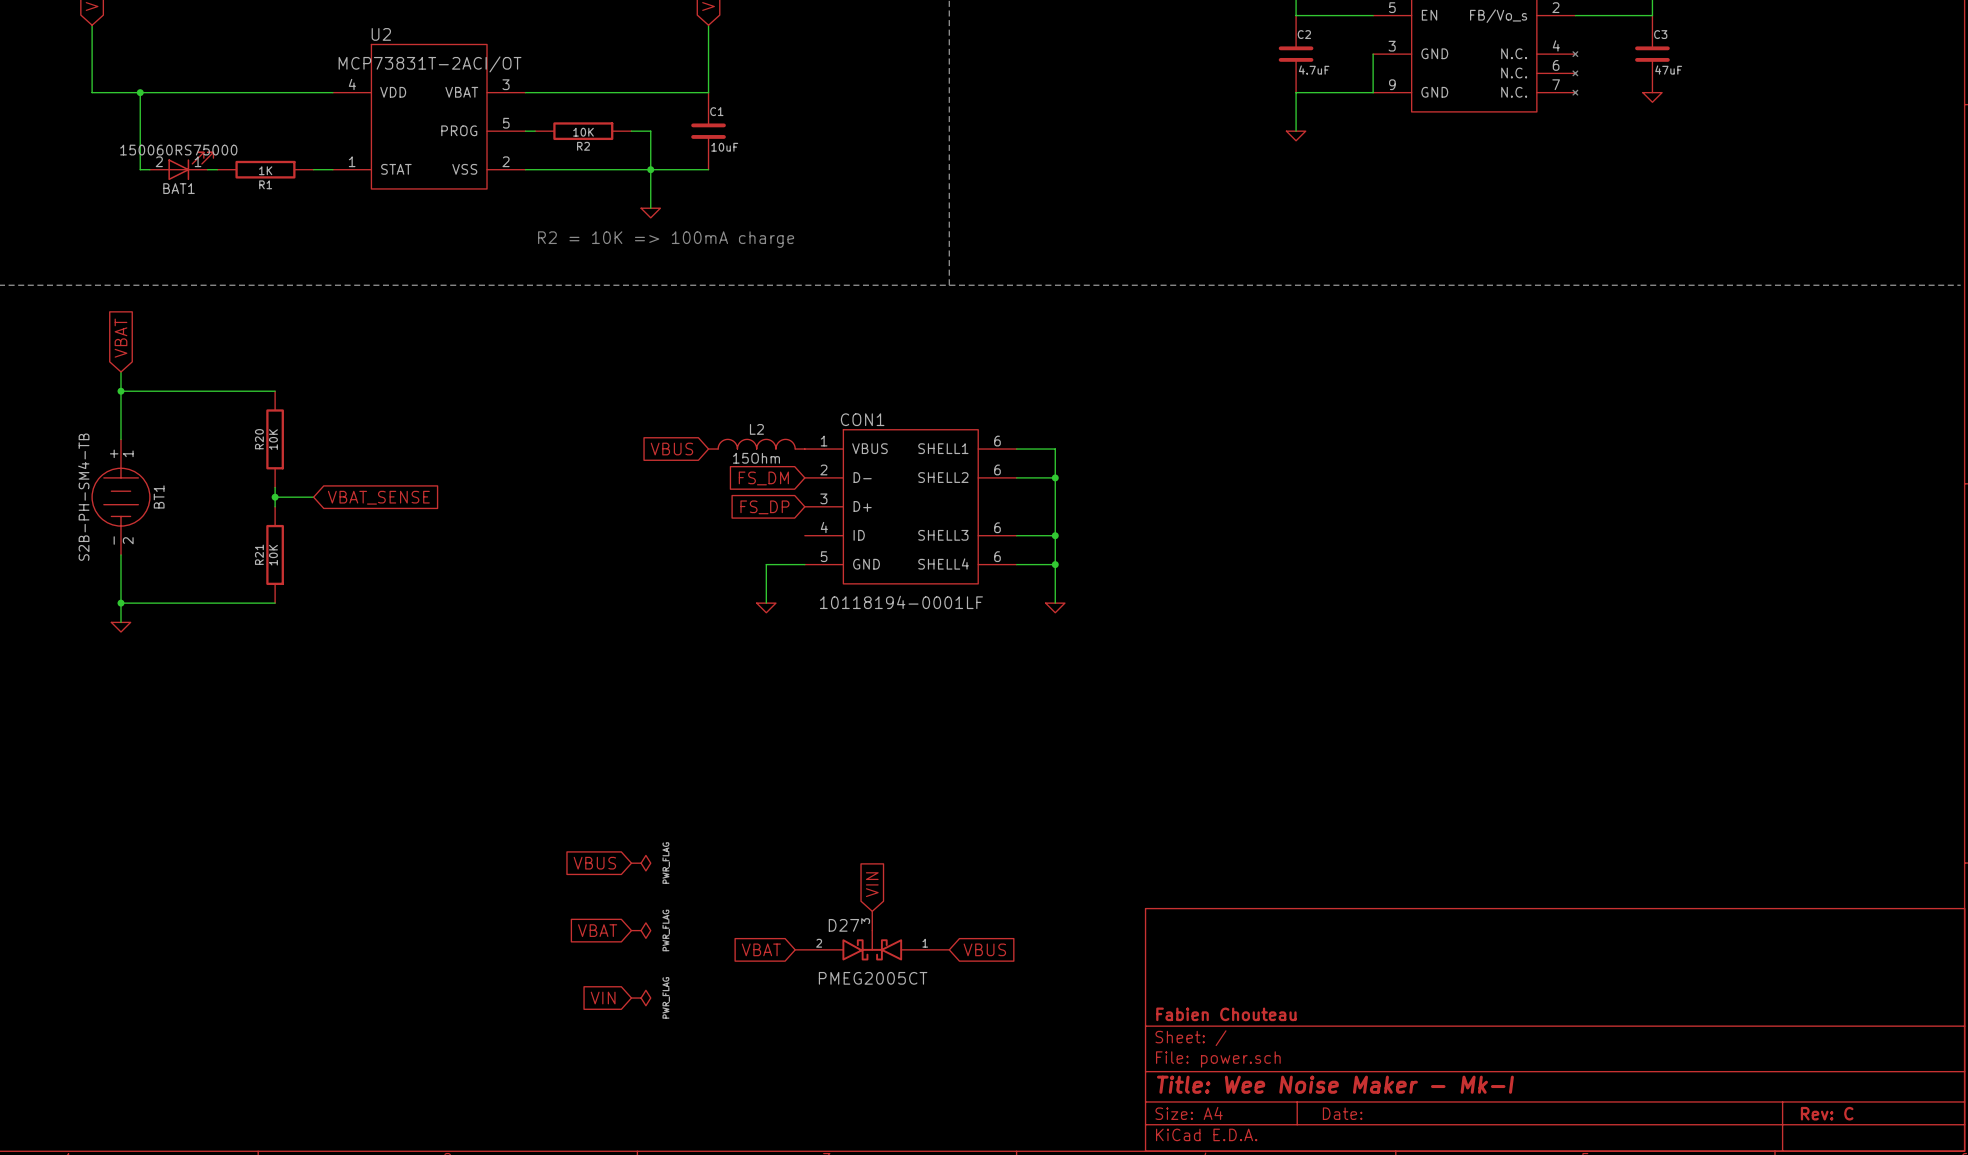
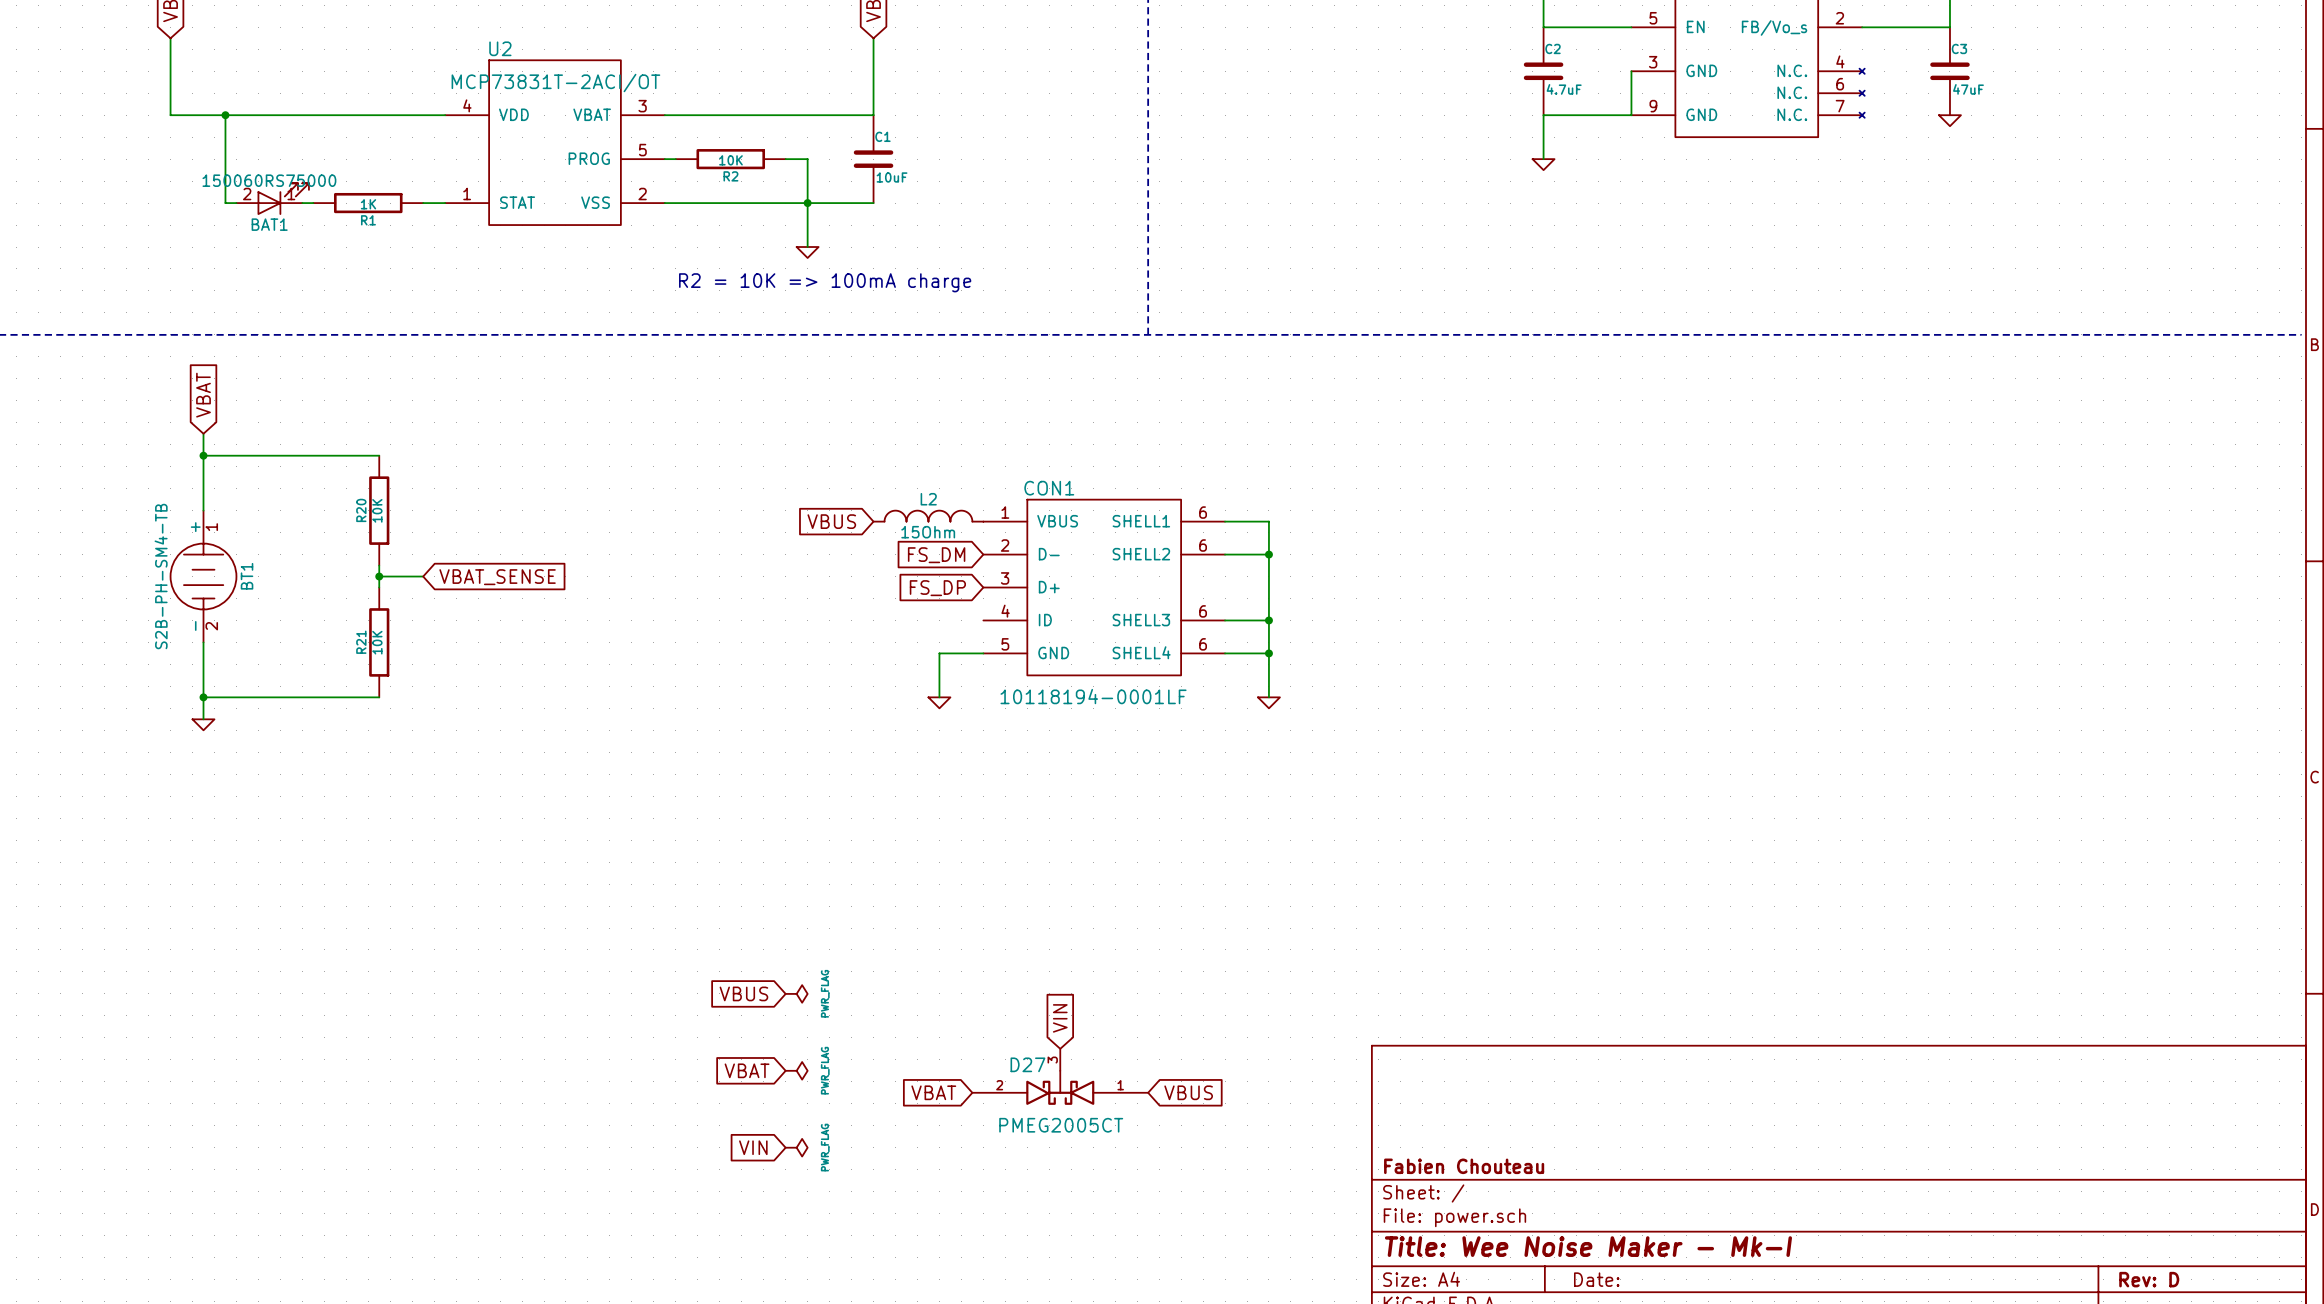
title block: Rev: C (1827, 1113) -> Rev: D (2149, 1279)

